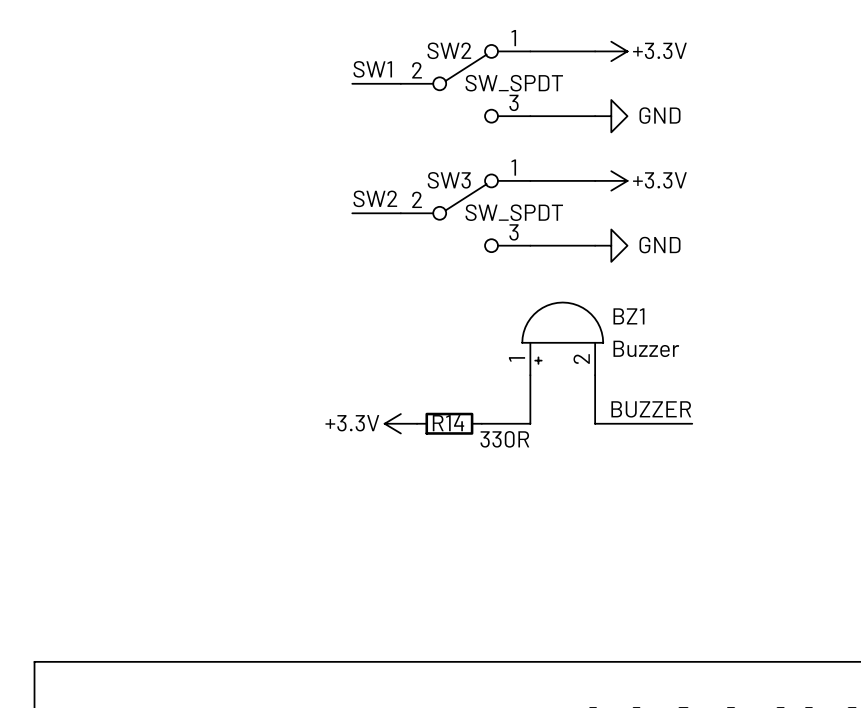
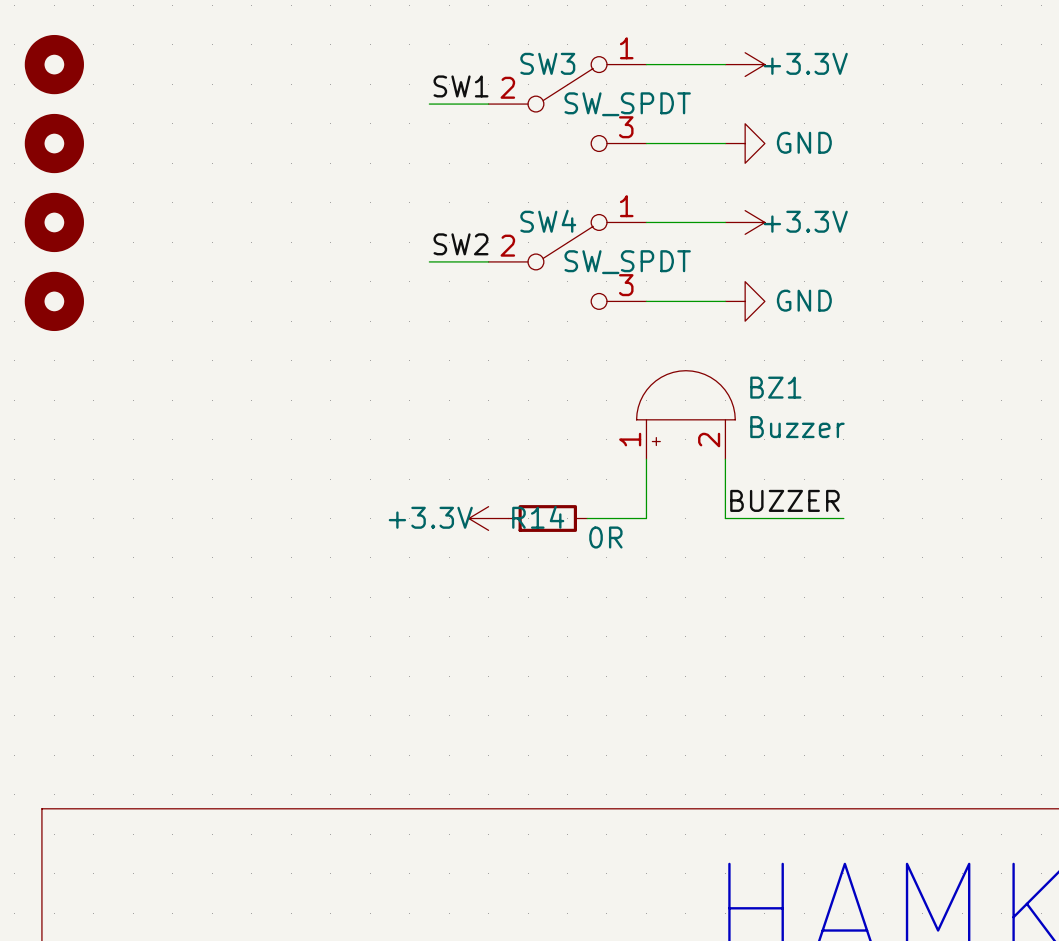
SW2 name: SW2 (449, 50) -> SW3 (547, 63)
part: none -> (54, 64)
part: none -> (54, 143)
part: none -> (54, 222)
SW3 name: SW3 (449, 180) -> SW4 (548, 221)
part: none -> (54, 301)
R14 value: 330R (504, 439) -> 0R (605, 537)

